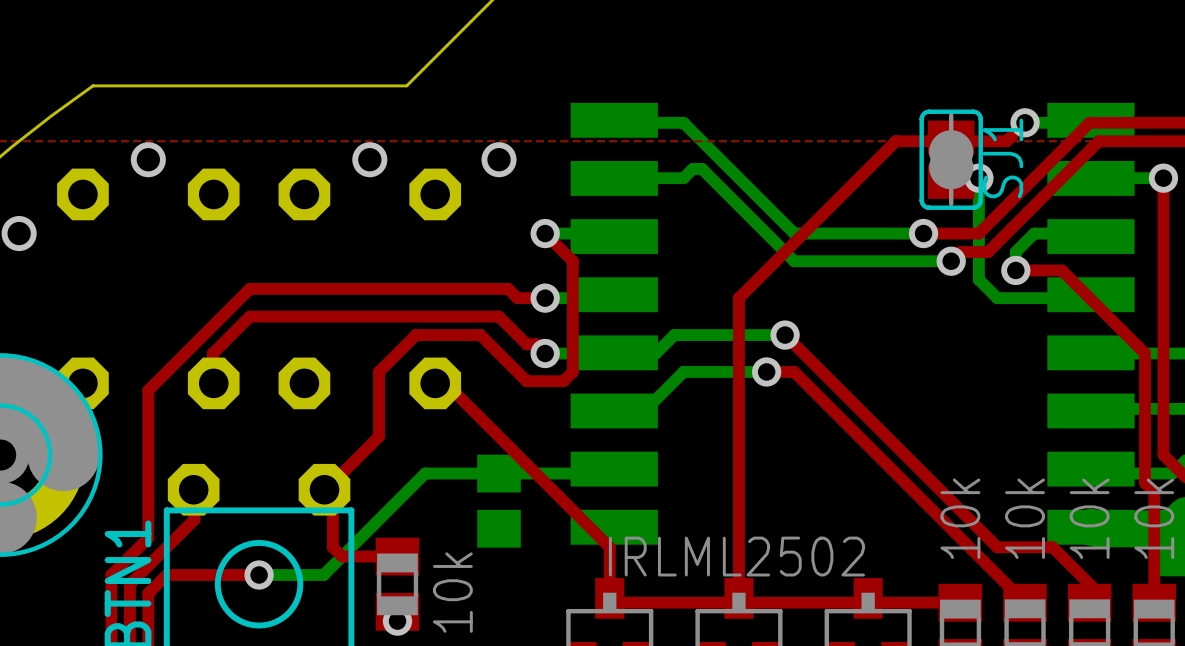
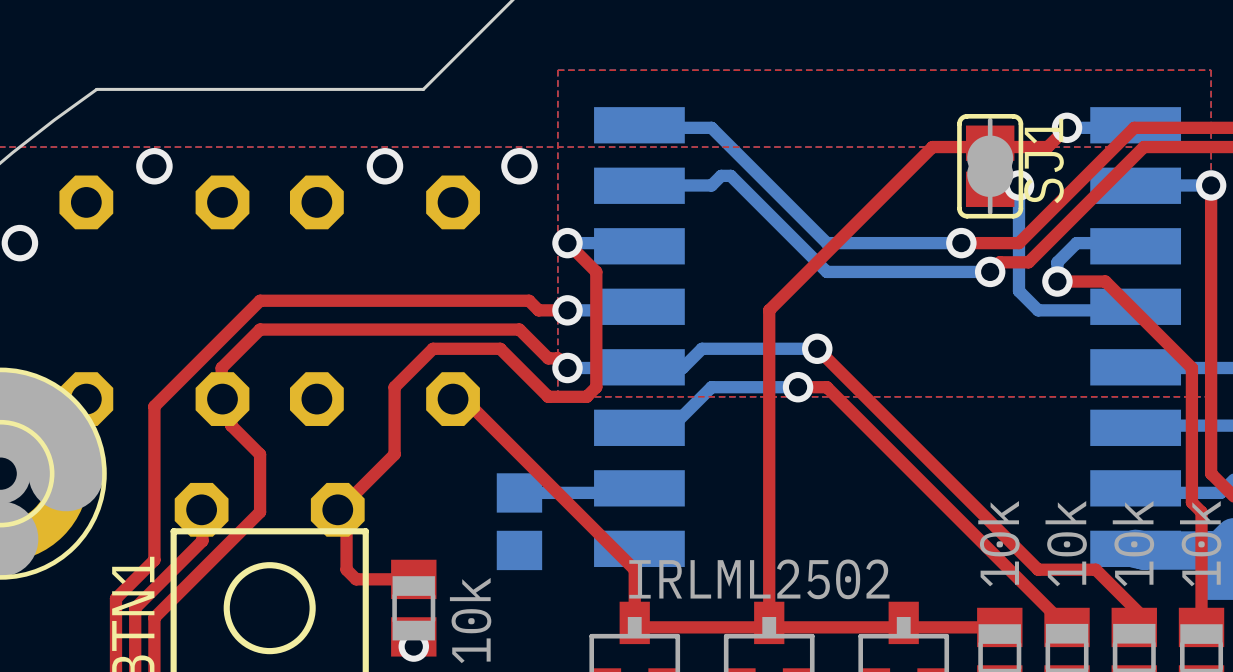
top zone outline: none -> (557, 70) (1211, 70) (1211, 396) (557, 396) (557, 70)
bottom track: (499, 473) (425, 473) (323, 575) (259, 575) -> none
top track: (166, 575) (259, 575) -> (173, 598) (260, 512) (260, 454) (231, 425) (231, 406) (222, 399)
via: (259, 575) -> none

